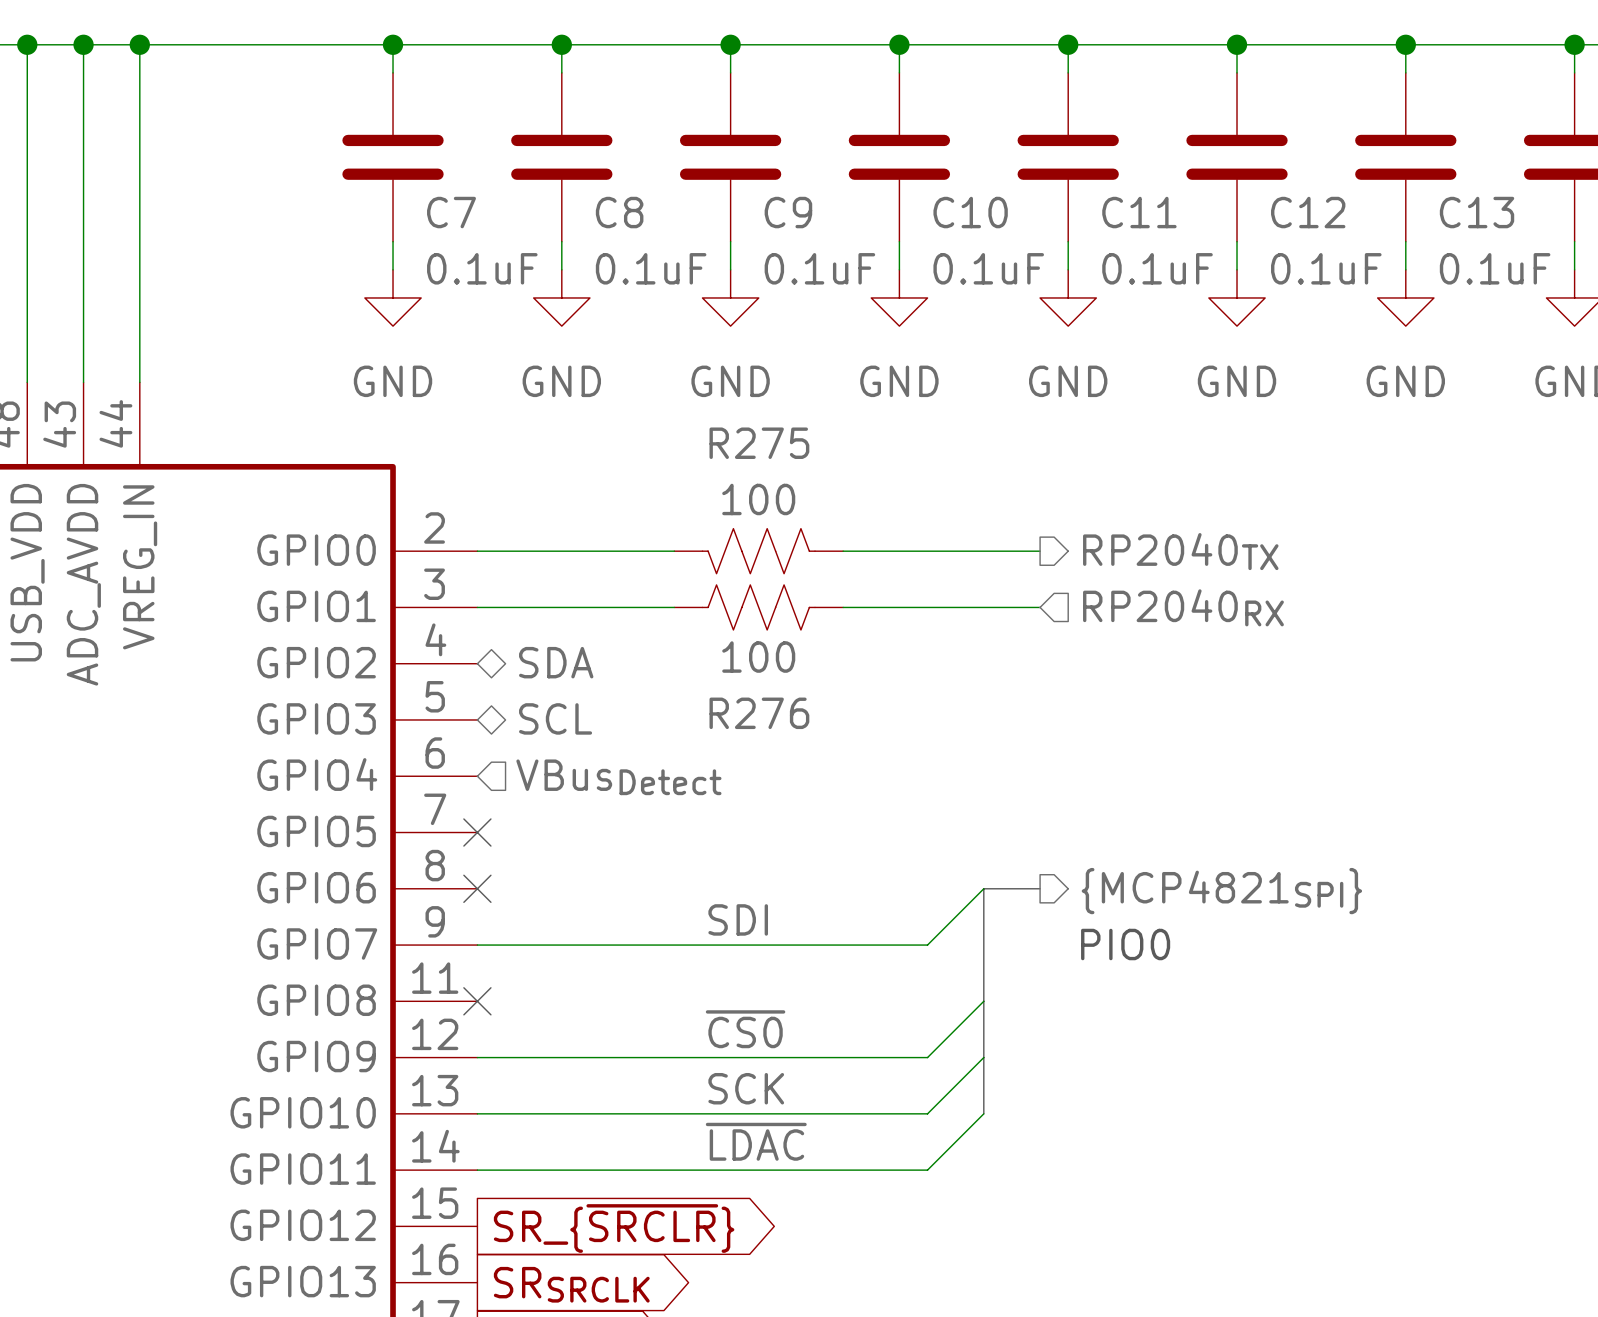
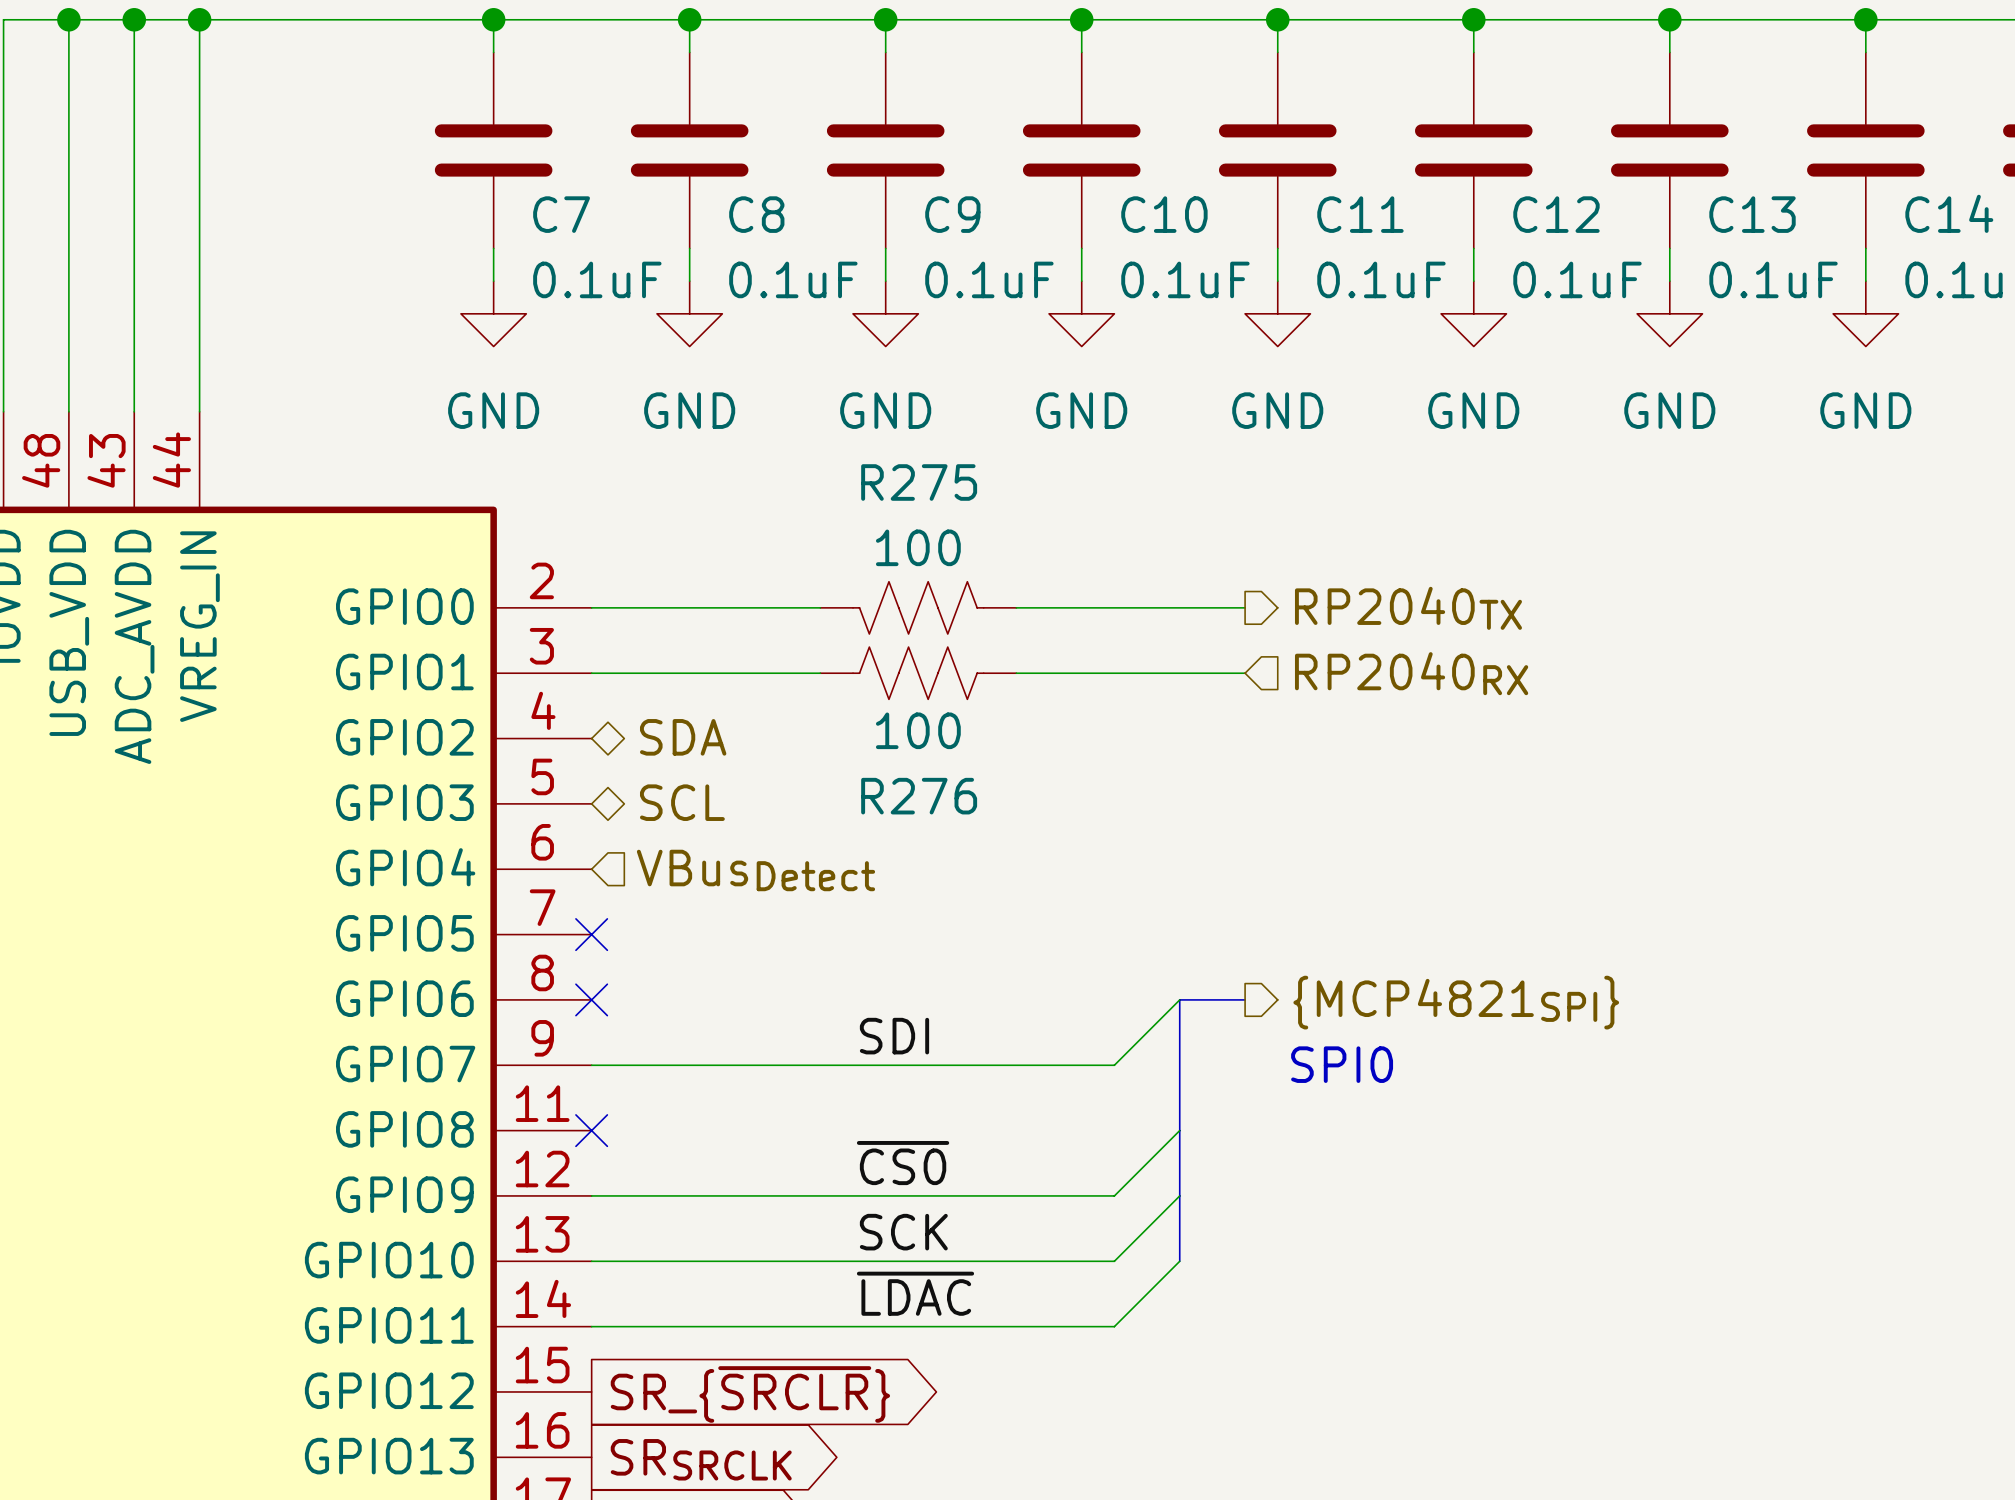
text: PIO0 (1125, 944) -> SPI0 (1342, 1064)

